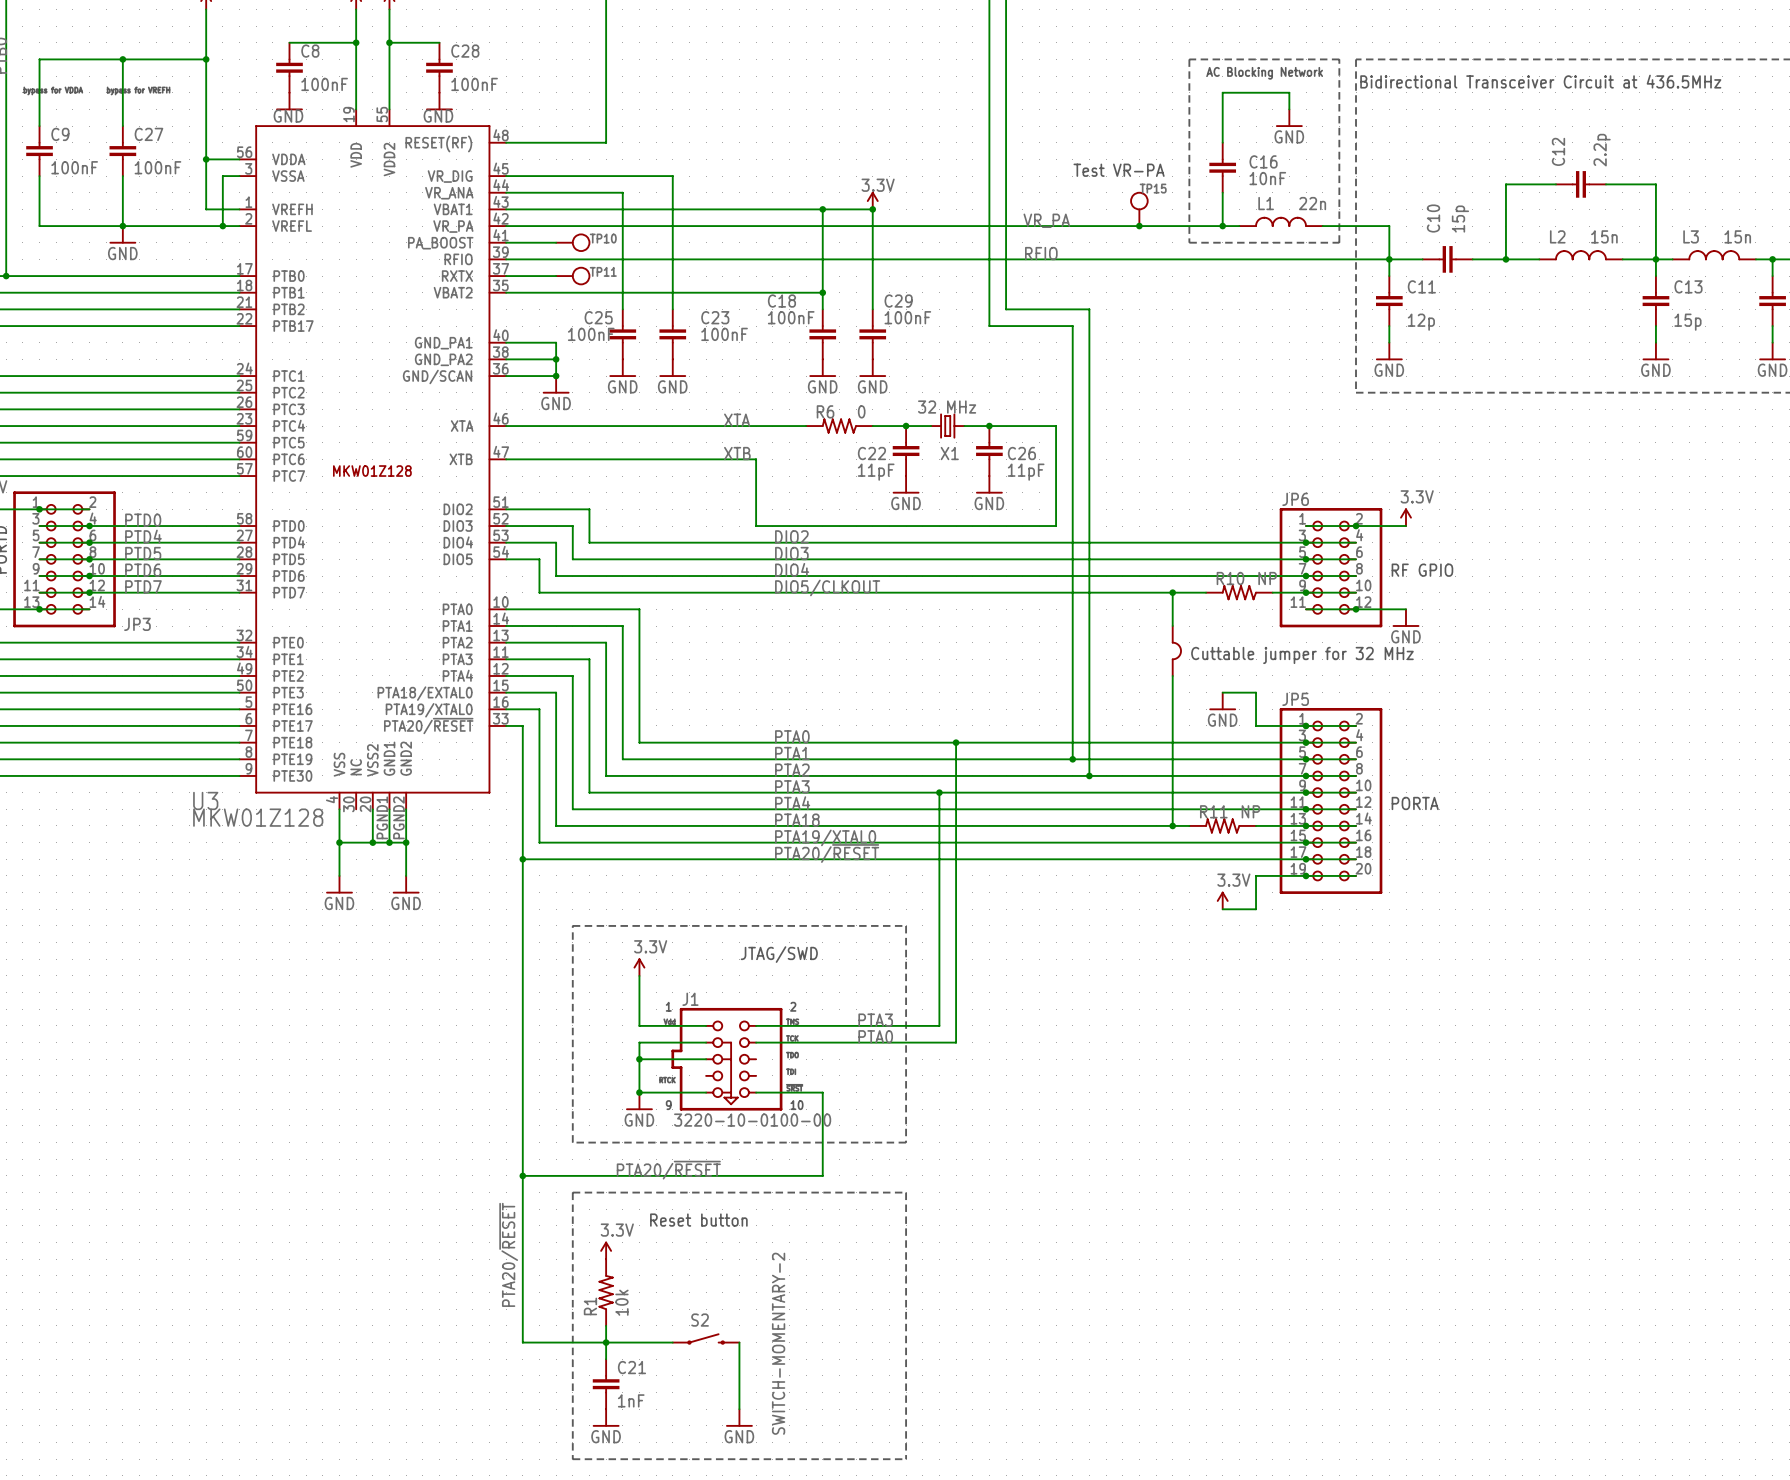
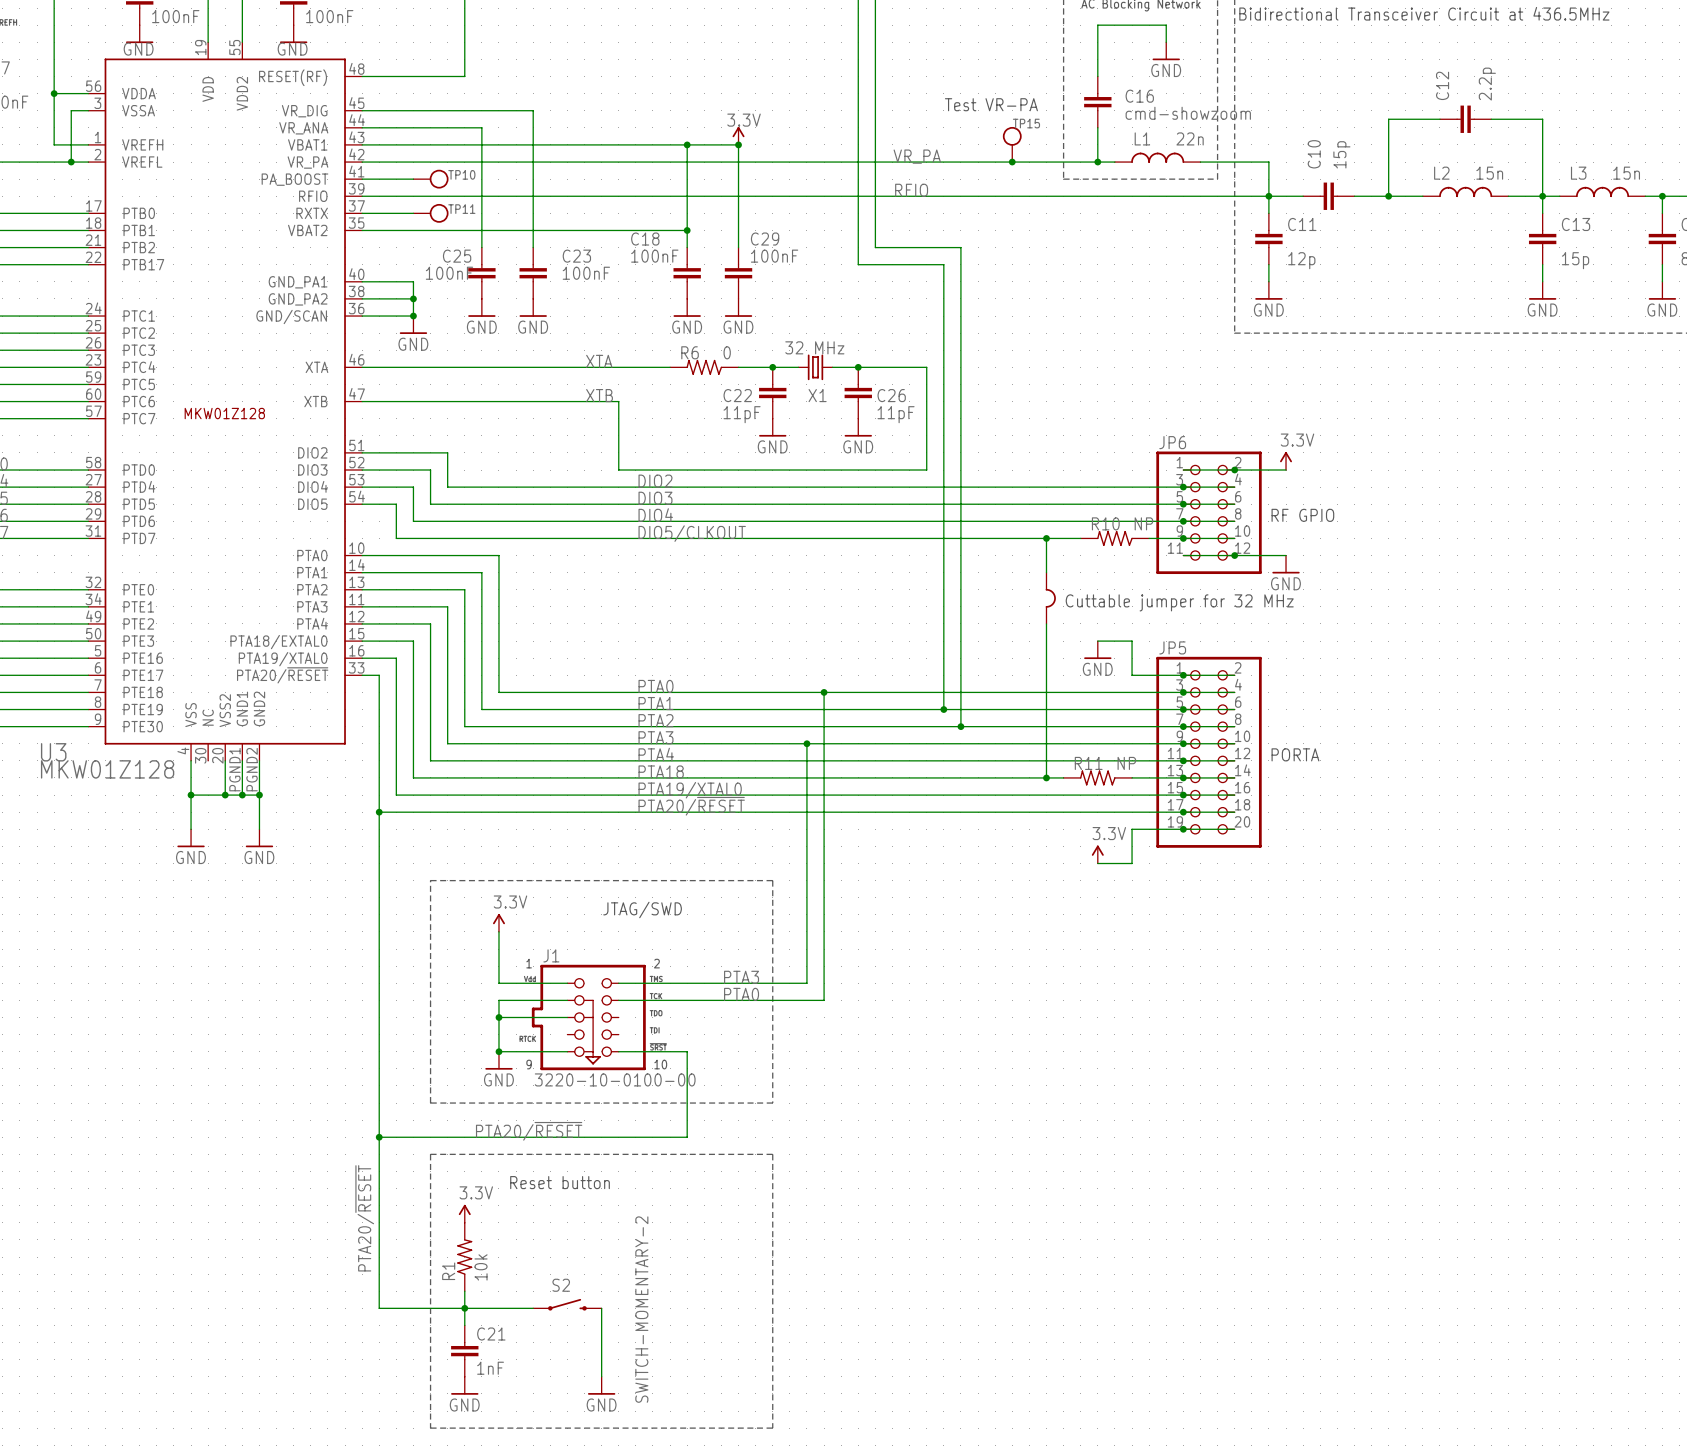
C16 value: 10nF (1267, 178) -> cmd-showzoom (1188, 113)

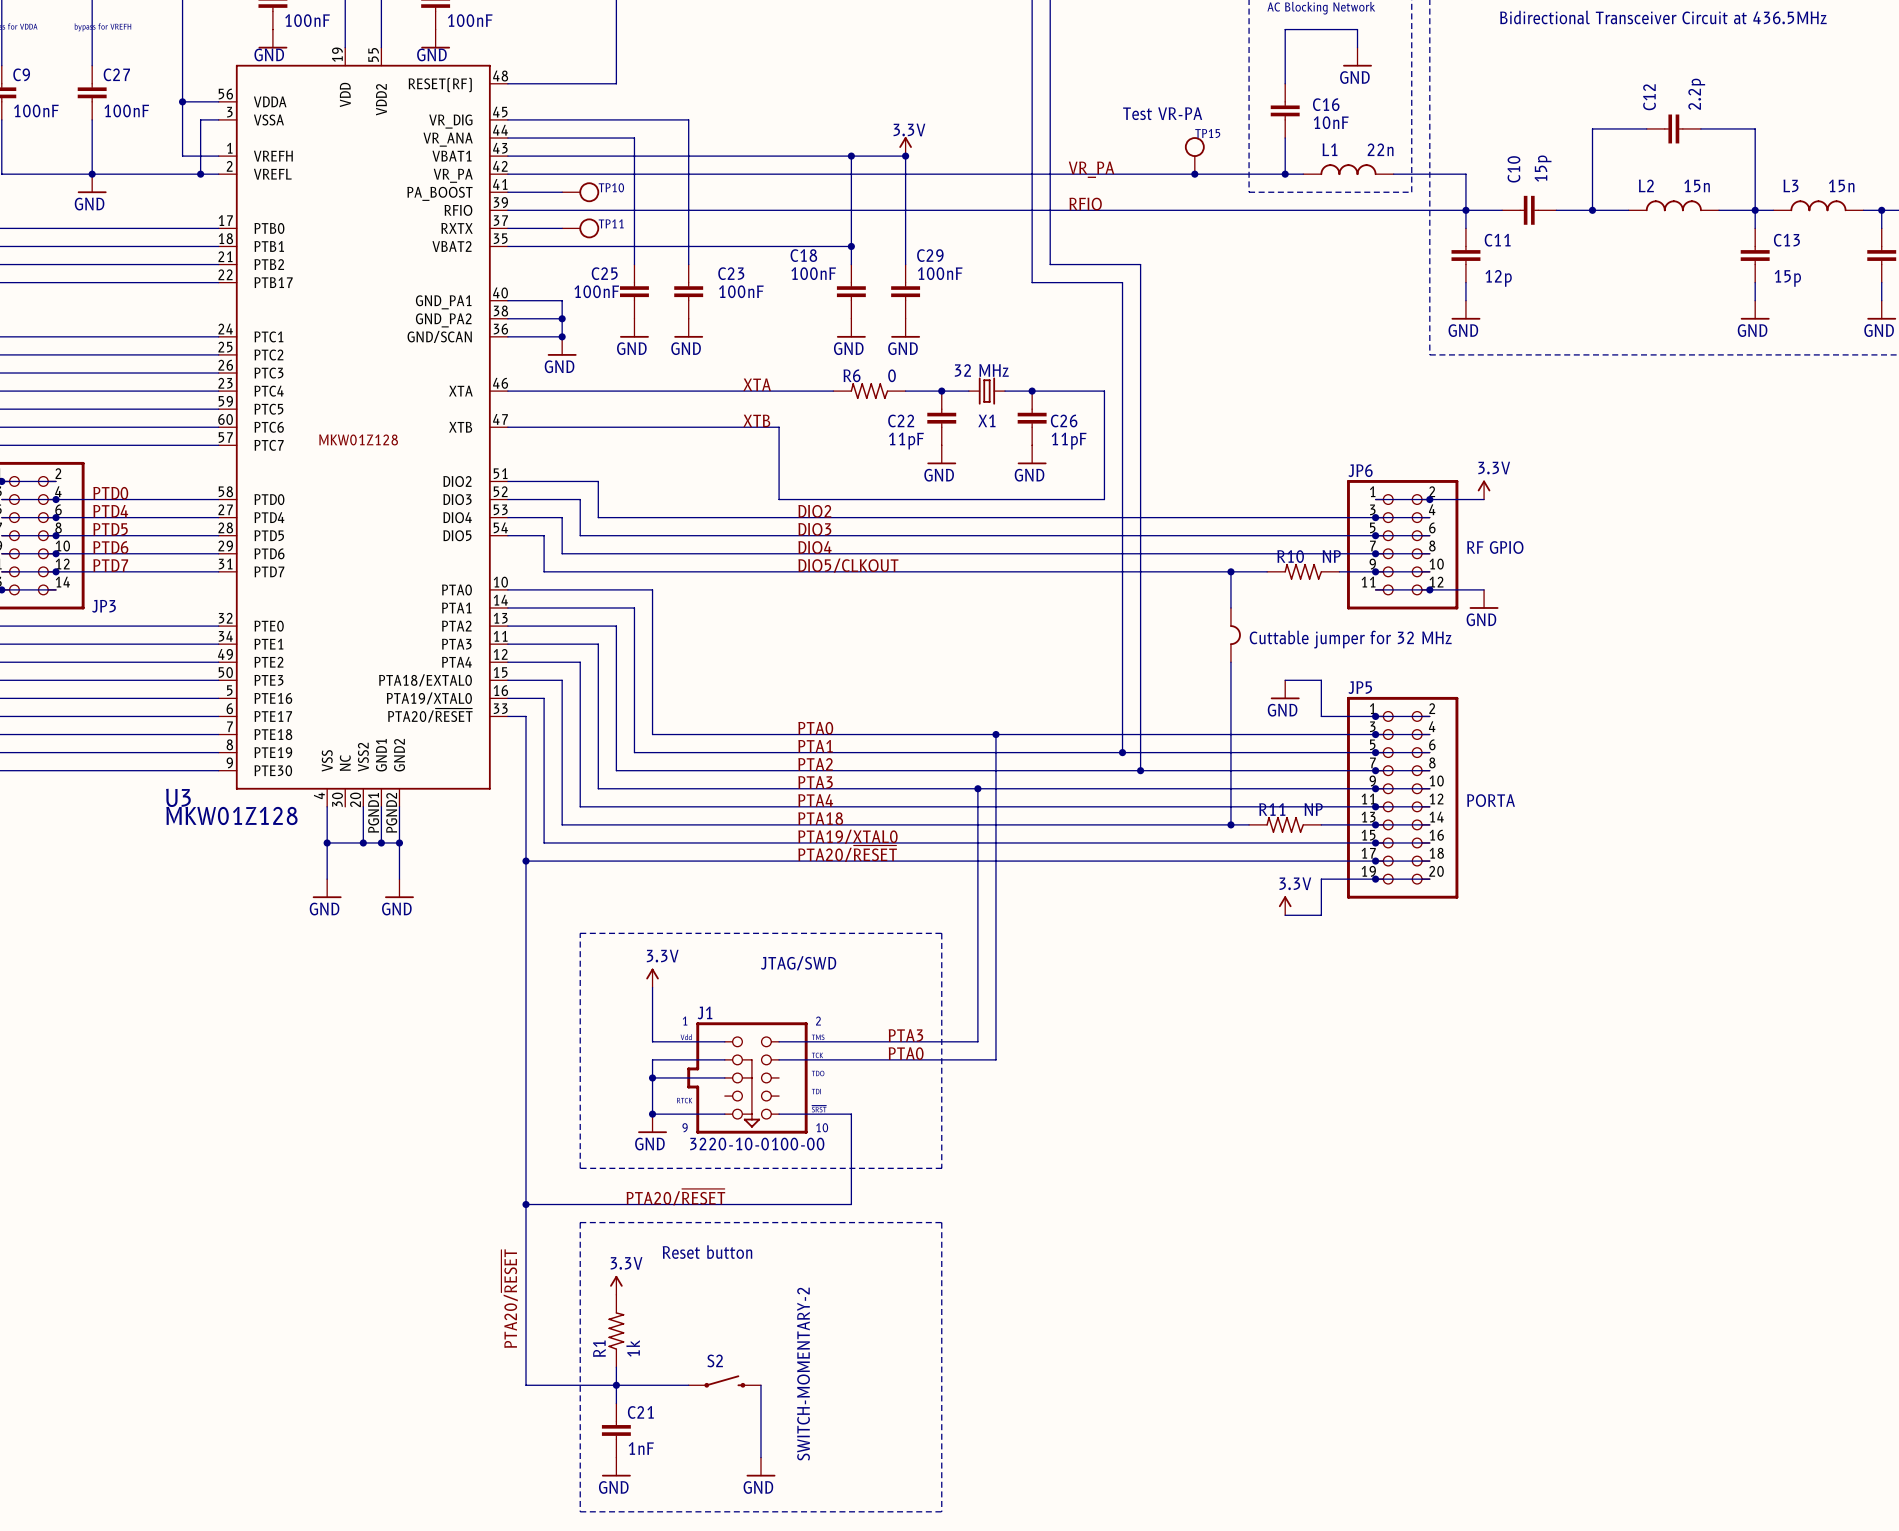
C16 value: cmd-showzoom (1188, 113) -> 10nF (1331, 122)
R1 value: 10k (481, 1267) -> 1k (633, 1348)

